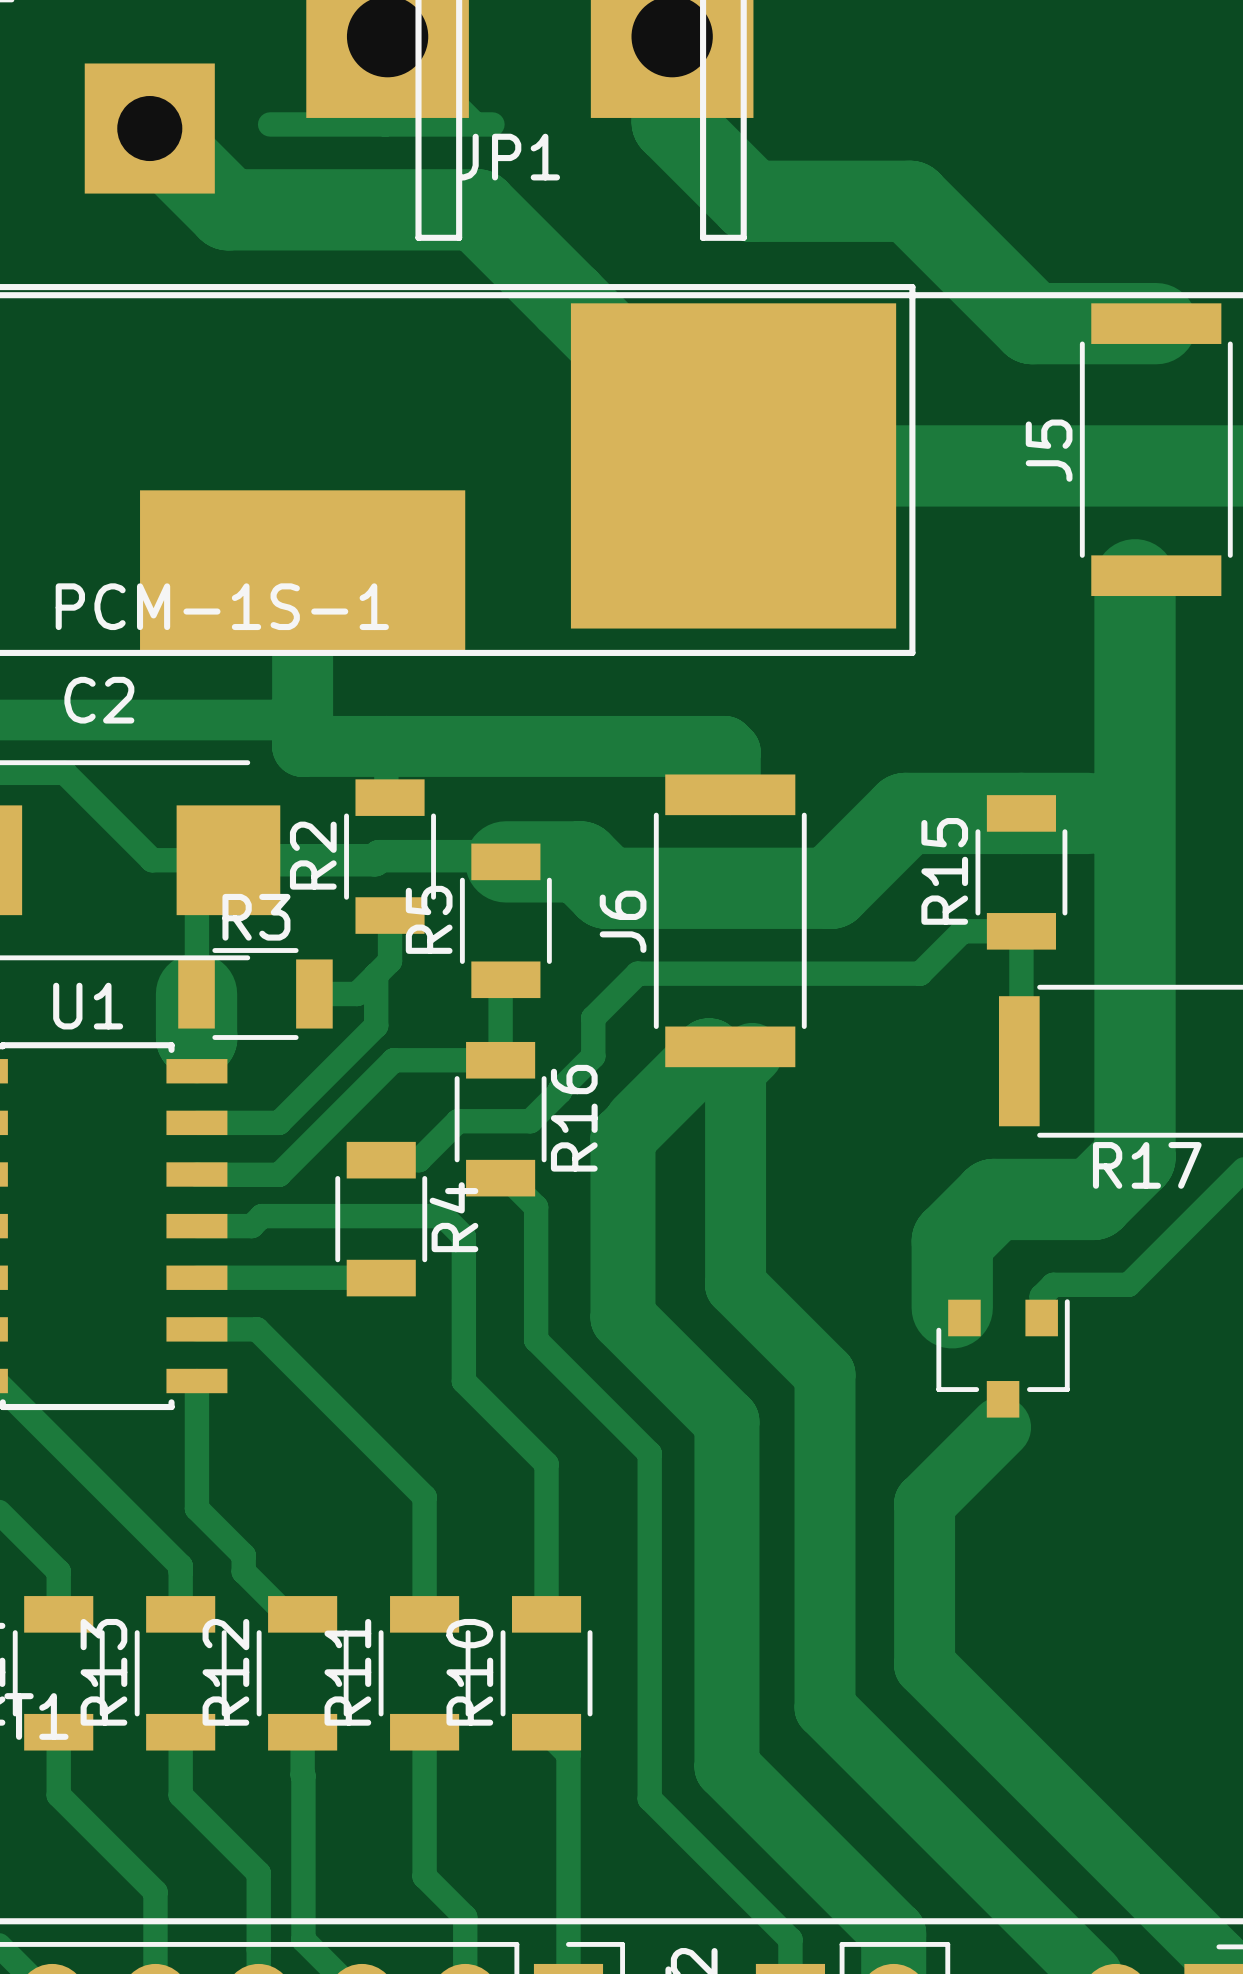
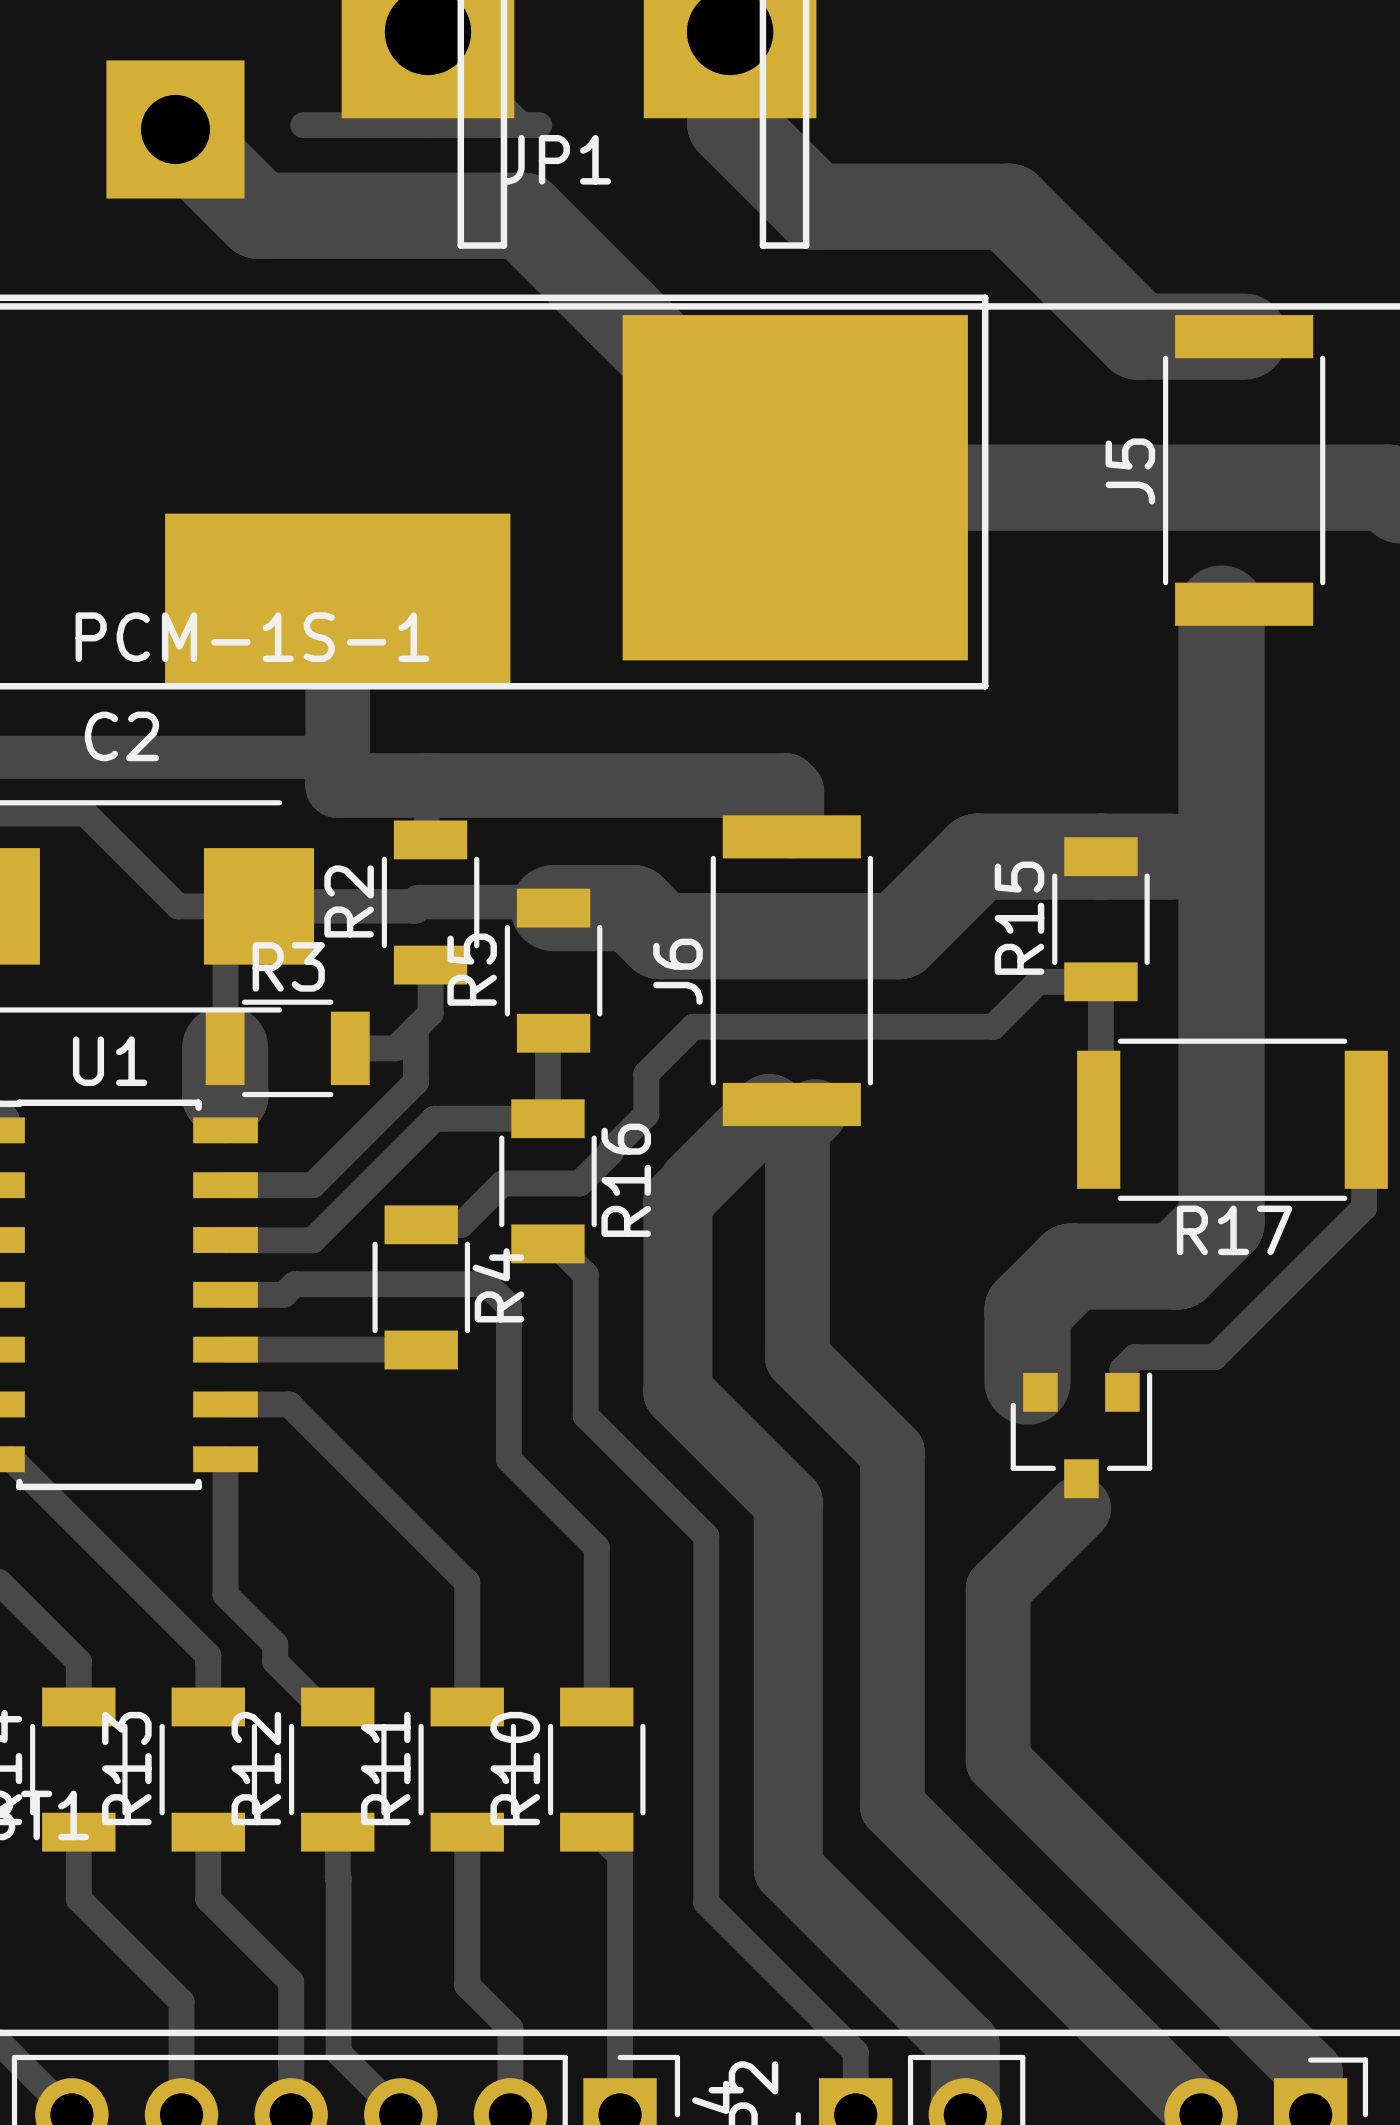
track: (909, 201) (1032, 323) (1056, 323) -> (982, 206) (1008, 206) (1138, 336)

